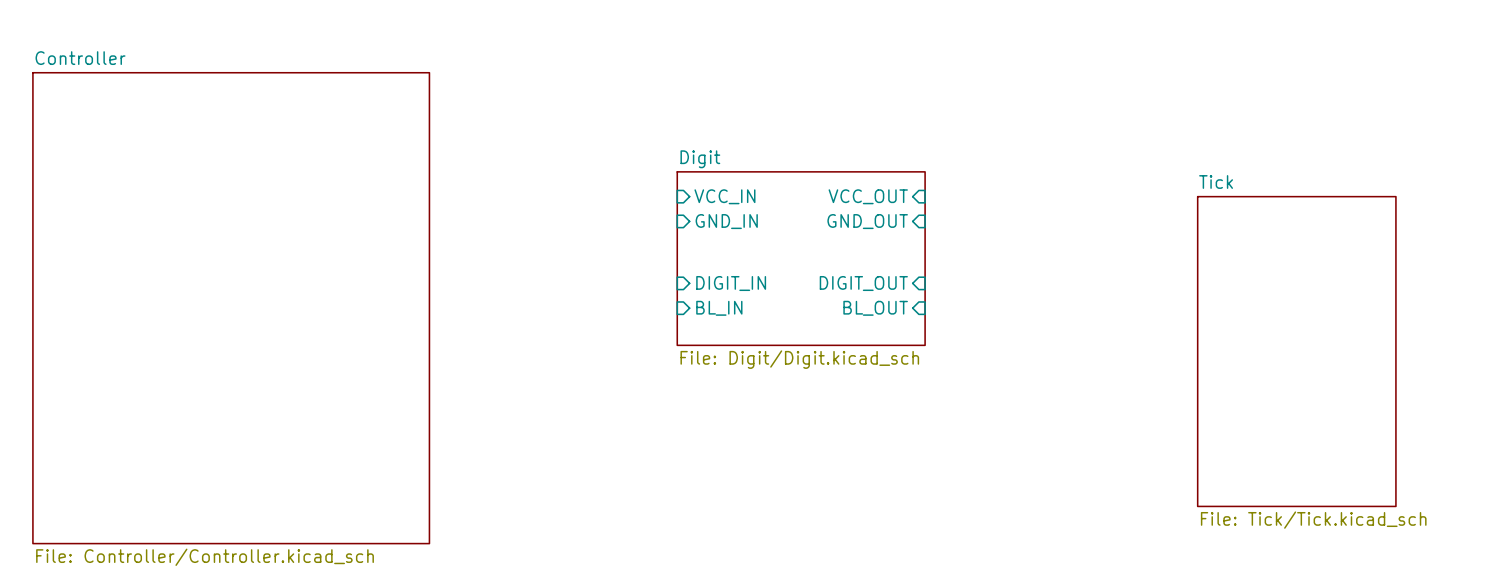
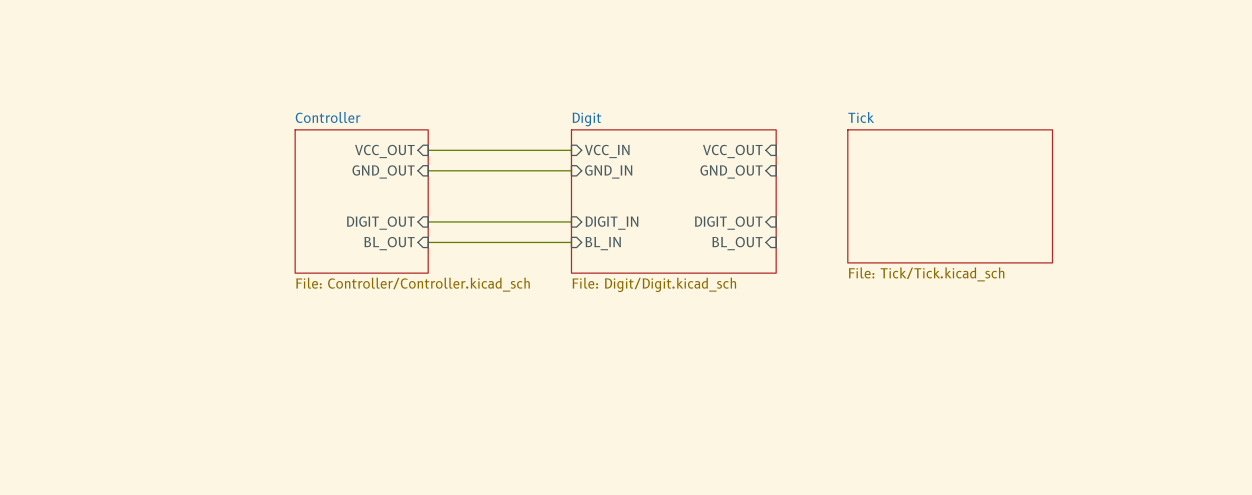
sheet pin: none -> VCC_OUT (384, 151)
wire: none -> (428, 150) (571, 150)
sheet pin: none -> GND_OUT (383, 171)
wire: none -> (428, 170) (571, 170)
sheet Tick: none -> File: Tick/Tick.kicad_sch (950, 196)
sheet Controller: none -> File: Controller/Controller.kicad_sch (361, 201)
sheet pin: none -> DIGIT_OUT (380, 223)
wire: none -> (428, 221) (571, 221)
sheet Controller: File: Controller/Controller.kicad_sch (231, 308) -> none
sheet pin: none -> BL_OUT (389, 243)
wire: none -> (428, 242) (571, 242)
sheet Tick: File: Tick/Tick.kicad_sch (1296, 351) -> none

